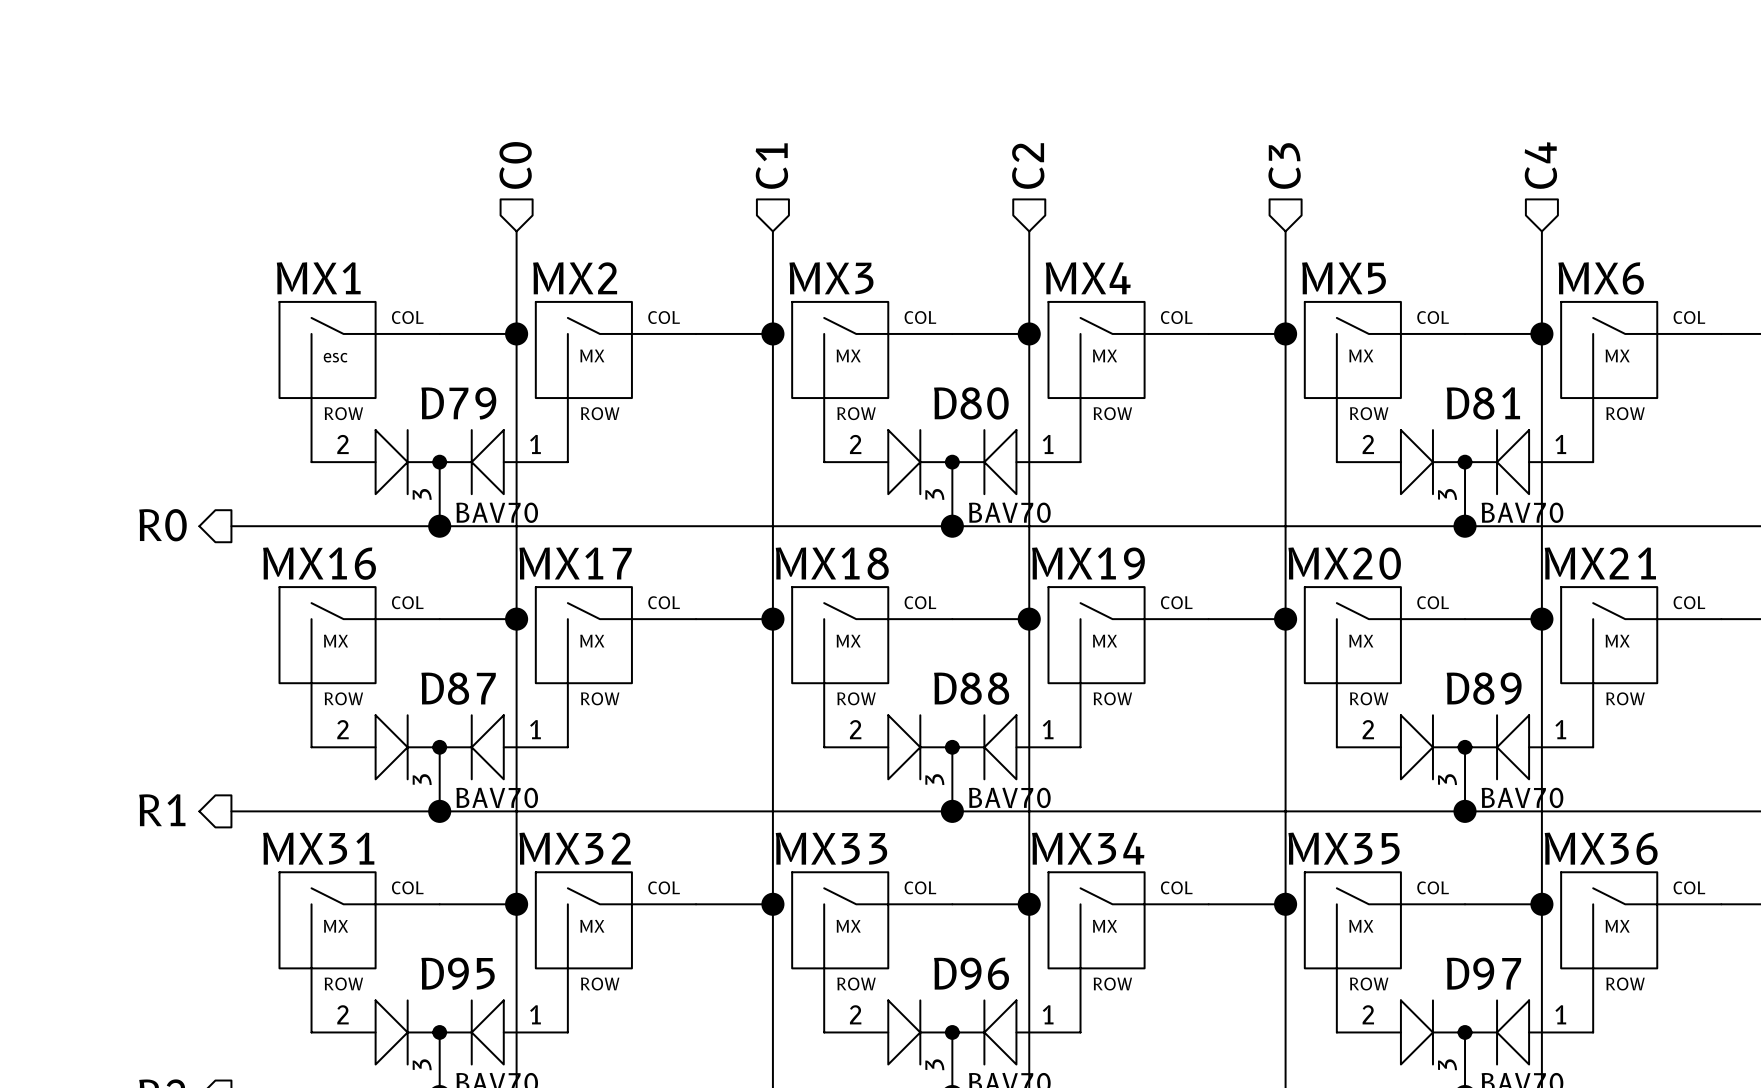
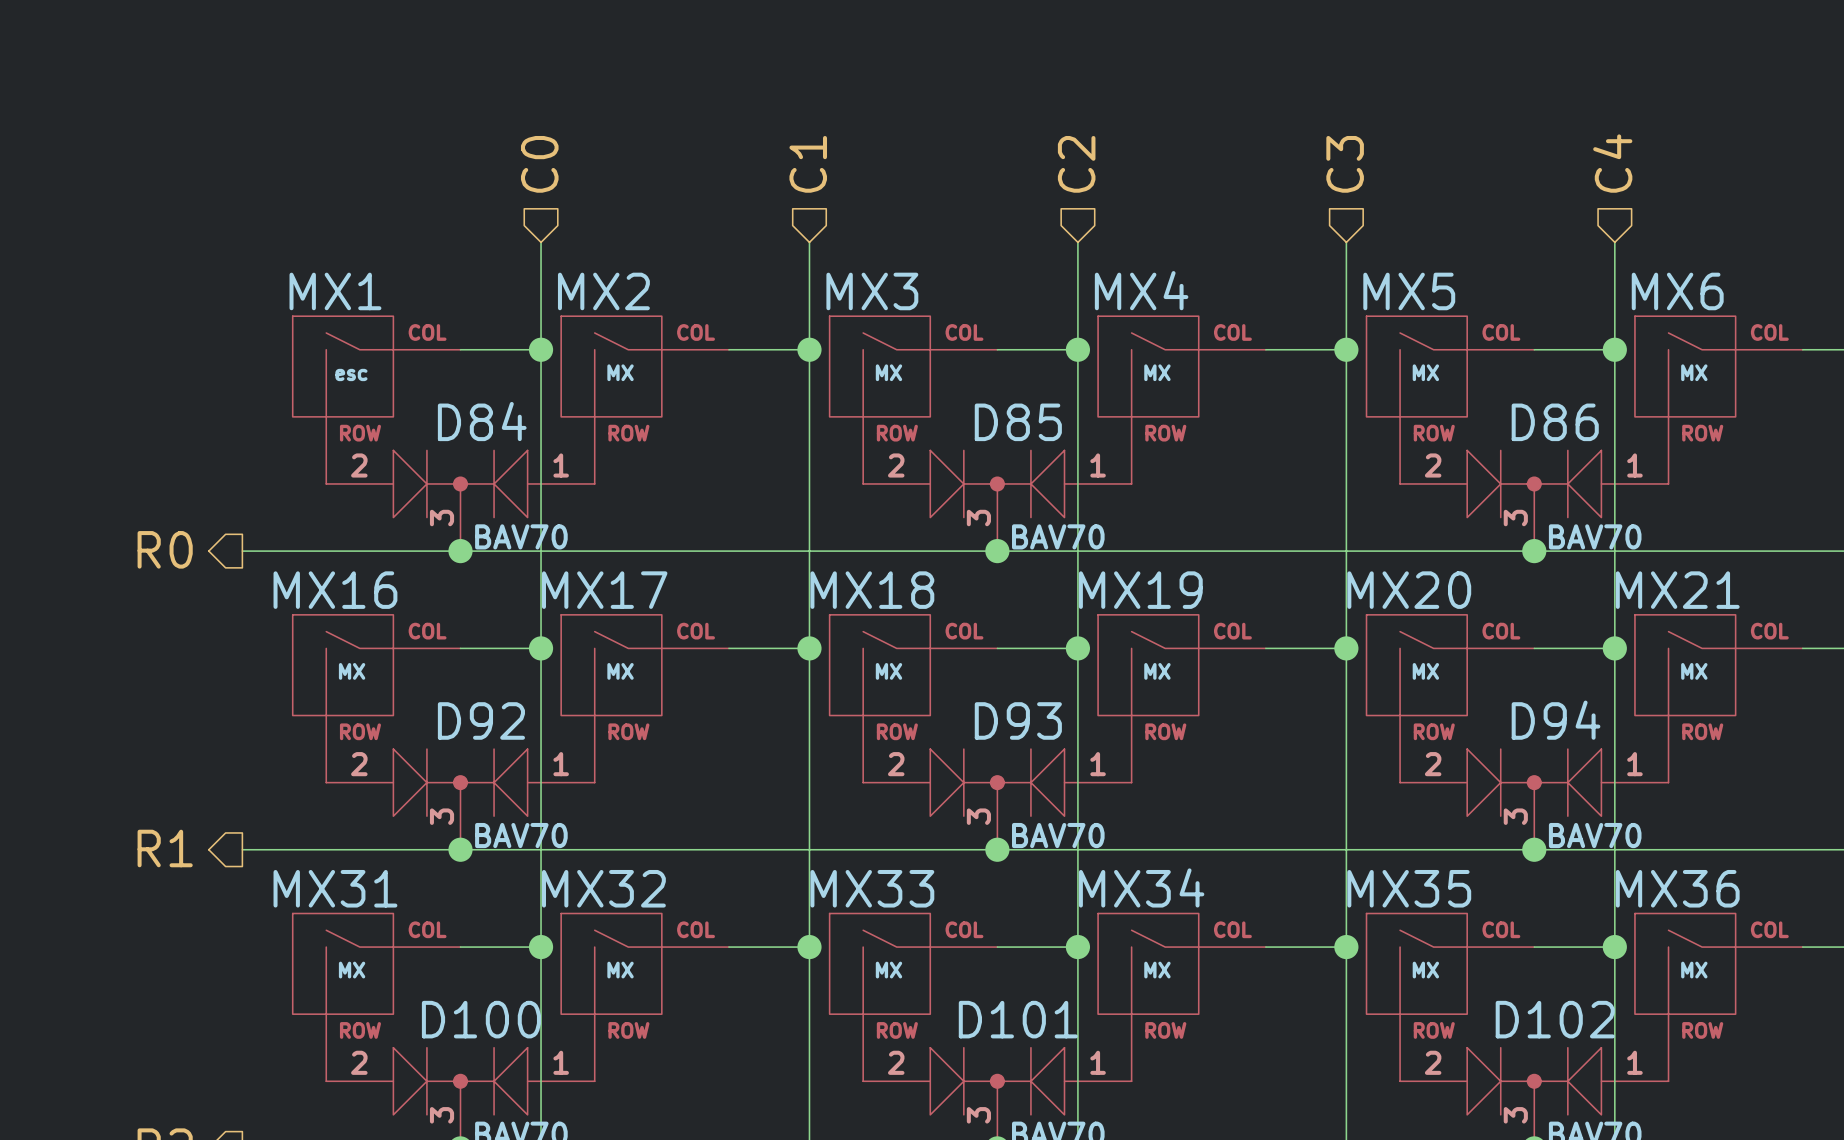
D79 name: D79 (458, 403) -> D84 (482, 421)
D80 name: D80 (971, 403) -> D85 (1018, 422)
D81 name: D81 (1483, 403) -> D86 (1555, 422)
D87 name: D87 (458, 688) -> D92 (481, 720)
D88 name: D88 (971, 688) -> D93 (1018, 720)
D89 name: D89 (1484, 688) -> D94 (1556, 720)
D95 name: D95 (458, 973) -> D100 (481, 1019)
D96 name: D96 (971, 973) -> D101 (1018, 1019)
D97 name: D97 (1483, 973) -> D102 (1555, 1019)

